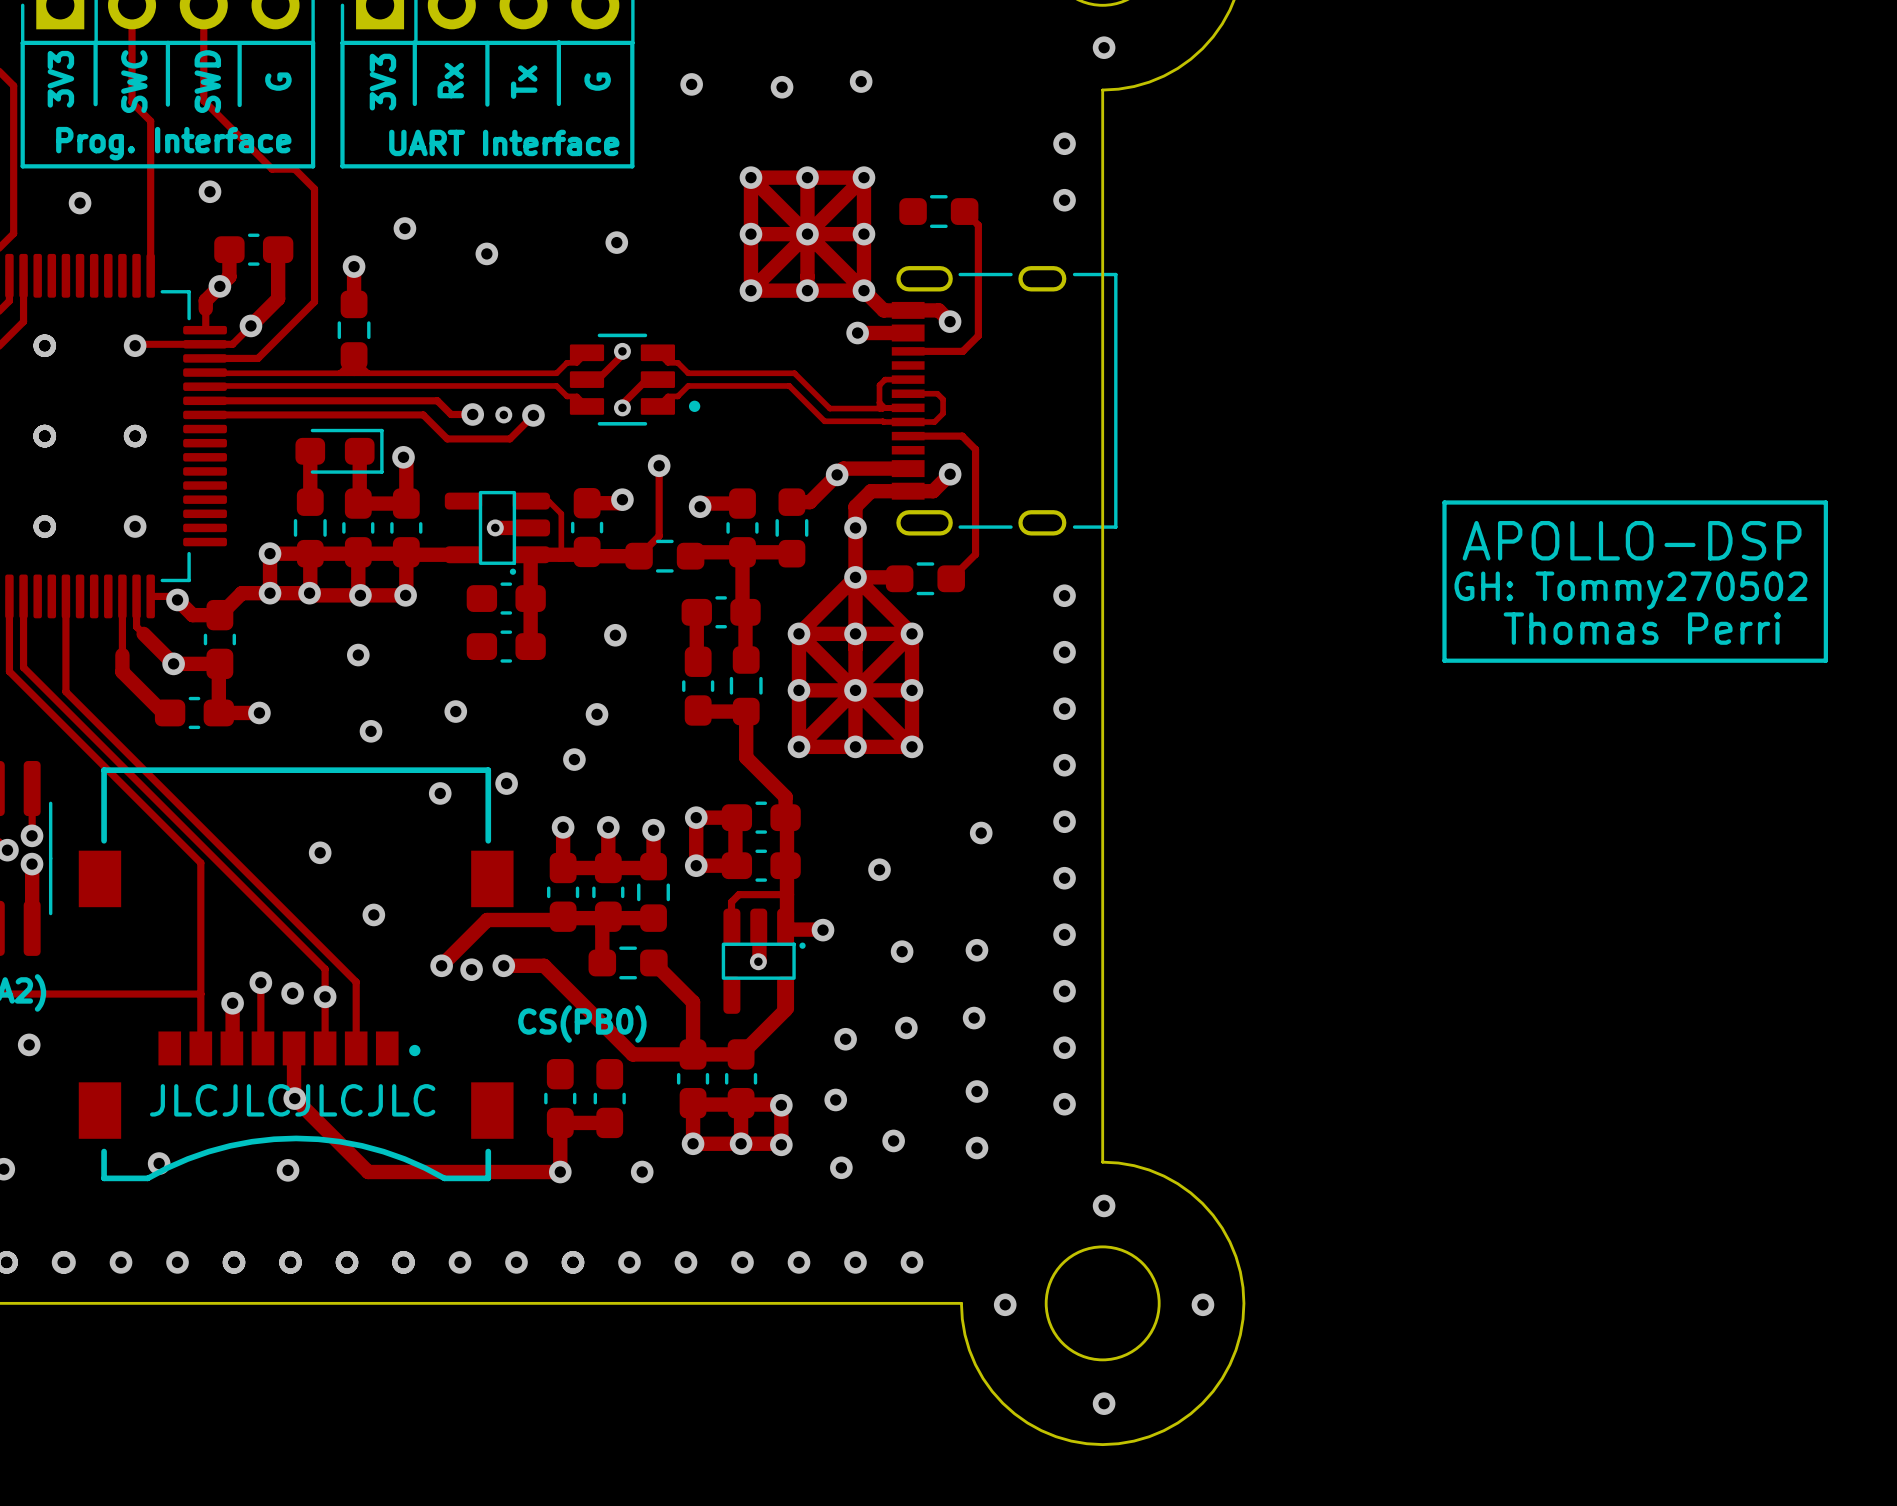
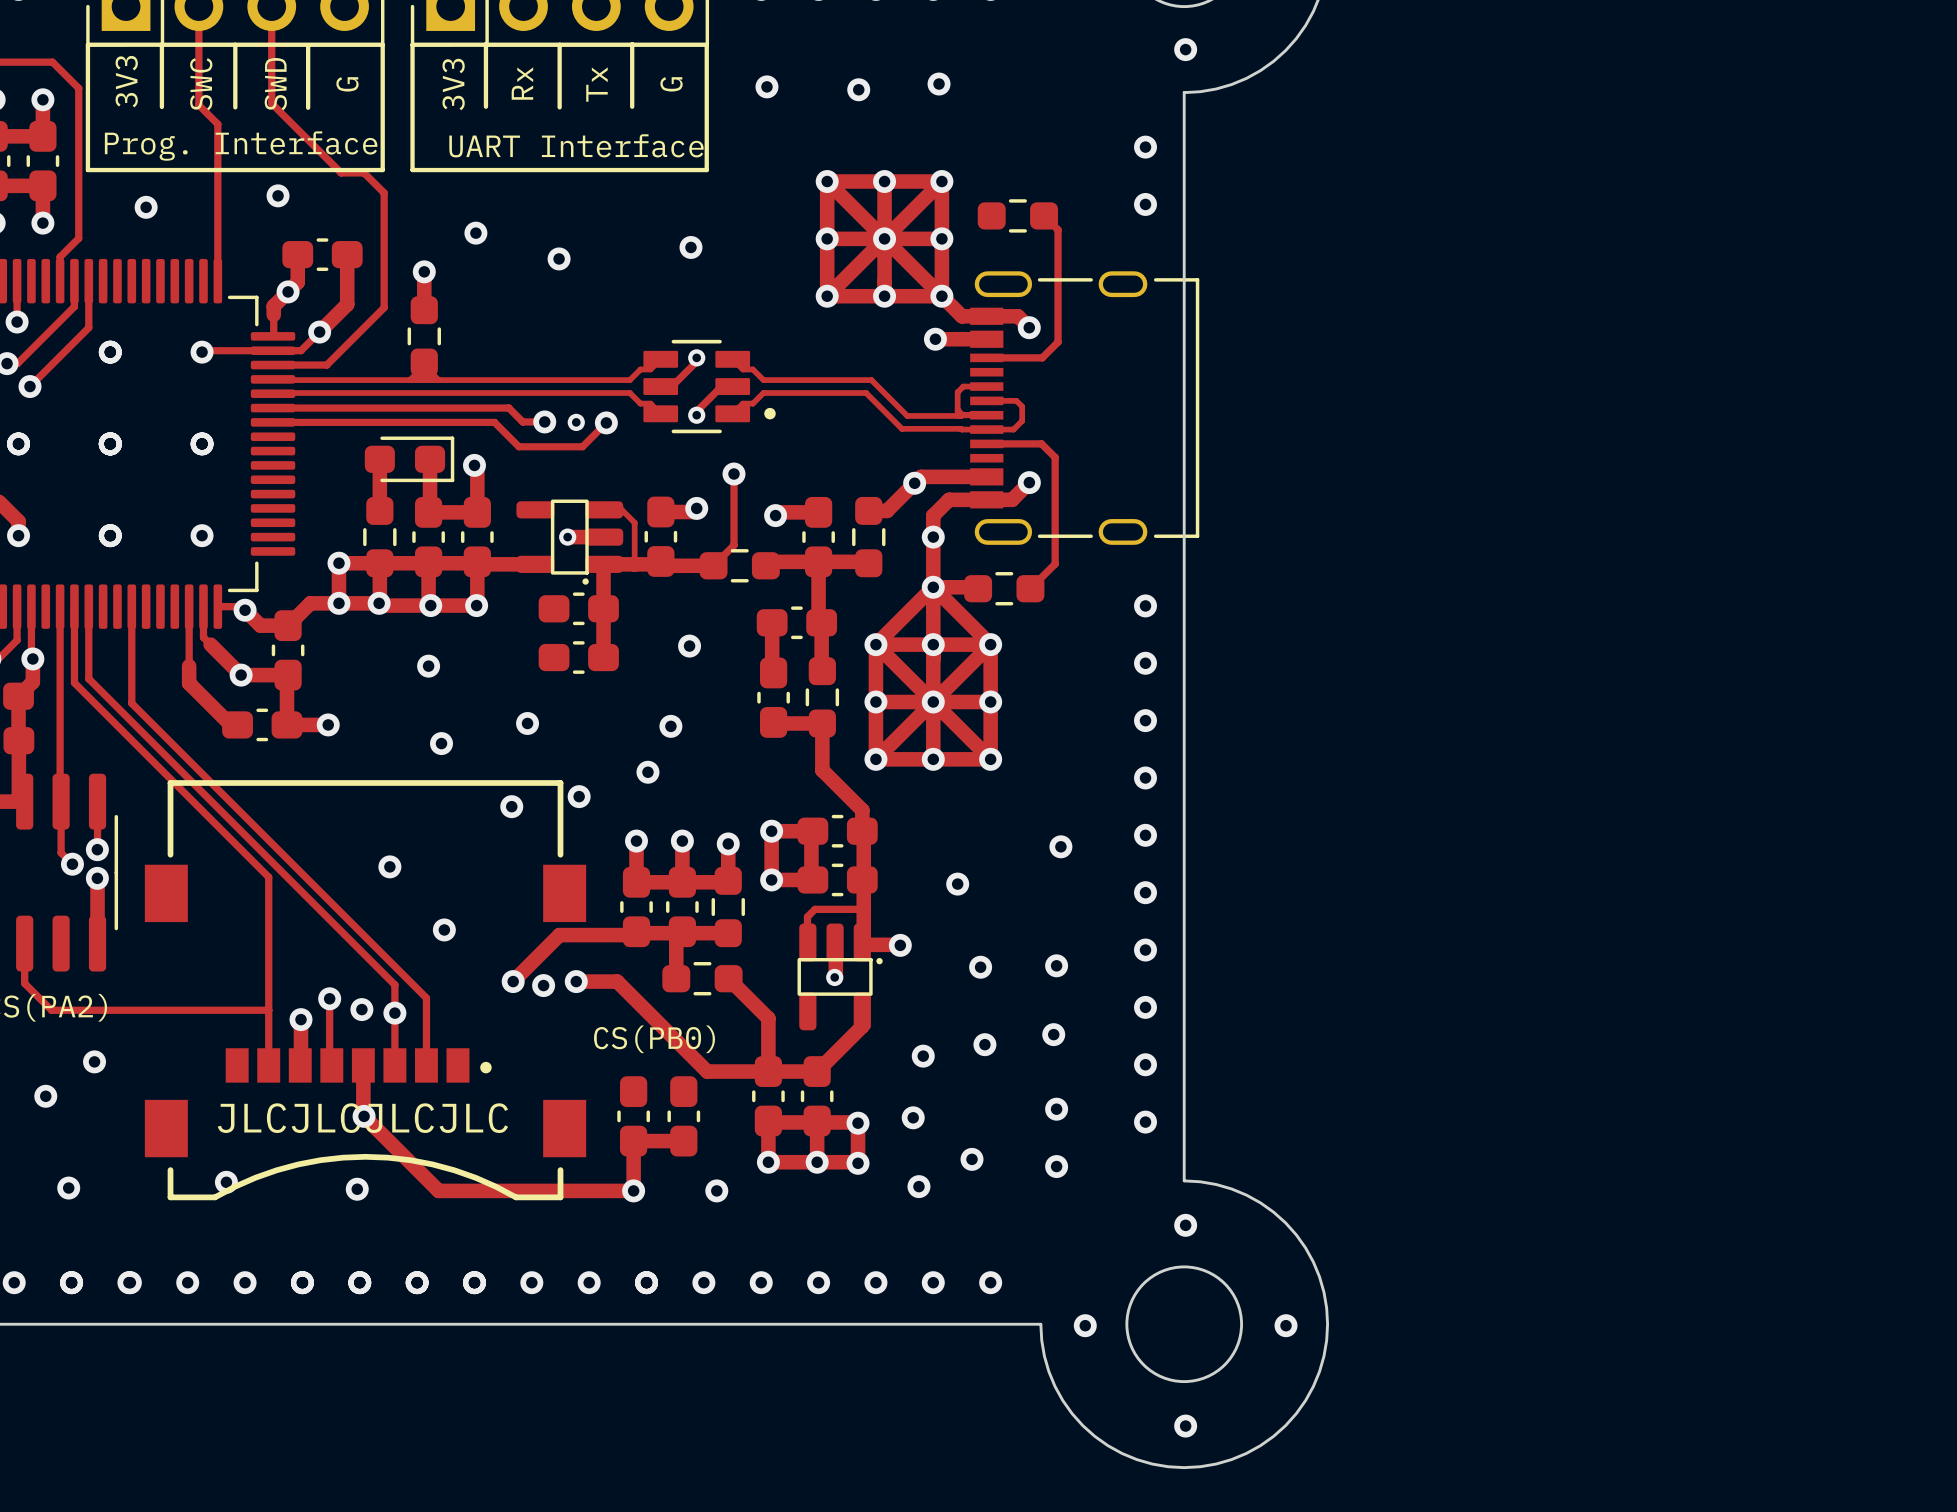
line: (1444, 502) (1825, 502) (1825, 660) (1444, 660) (1444, 502) -> none
text: APOLLO-DSP (1632, 540) -> none
text: GH: Tommy270502 (1630, 590) -> none
text: Thomas Perri (1642, 628) -> none

